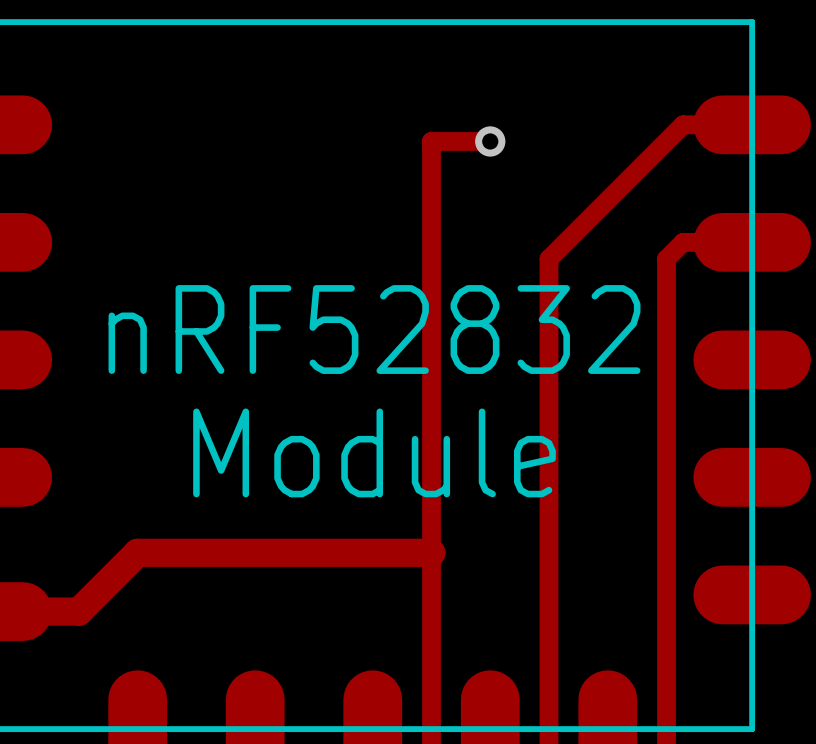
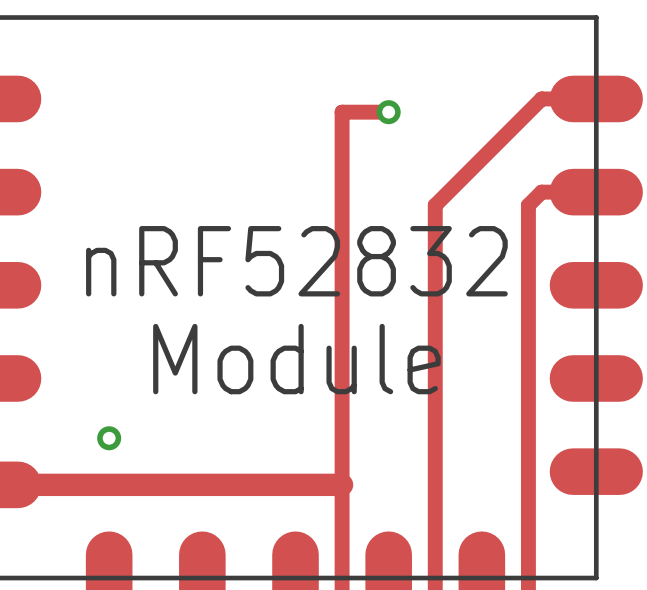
via: none -> (109, 438)
track: (431, 552) (137, 552) (78, 611) -> (342, 484) (62, 484)

